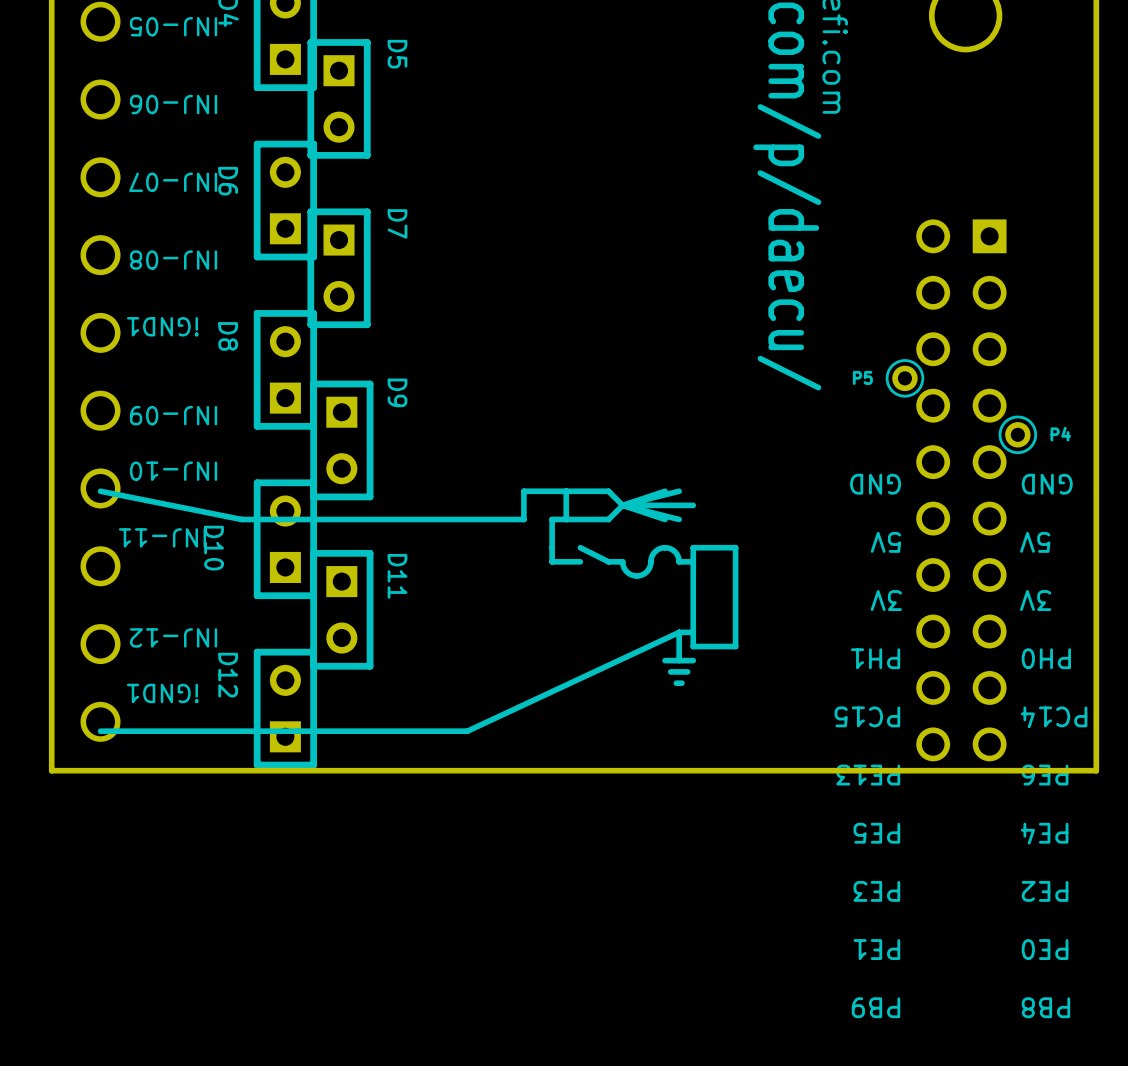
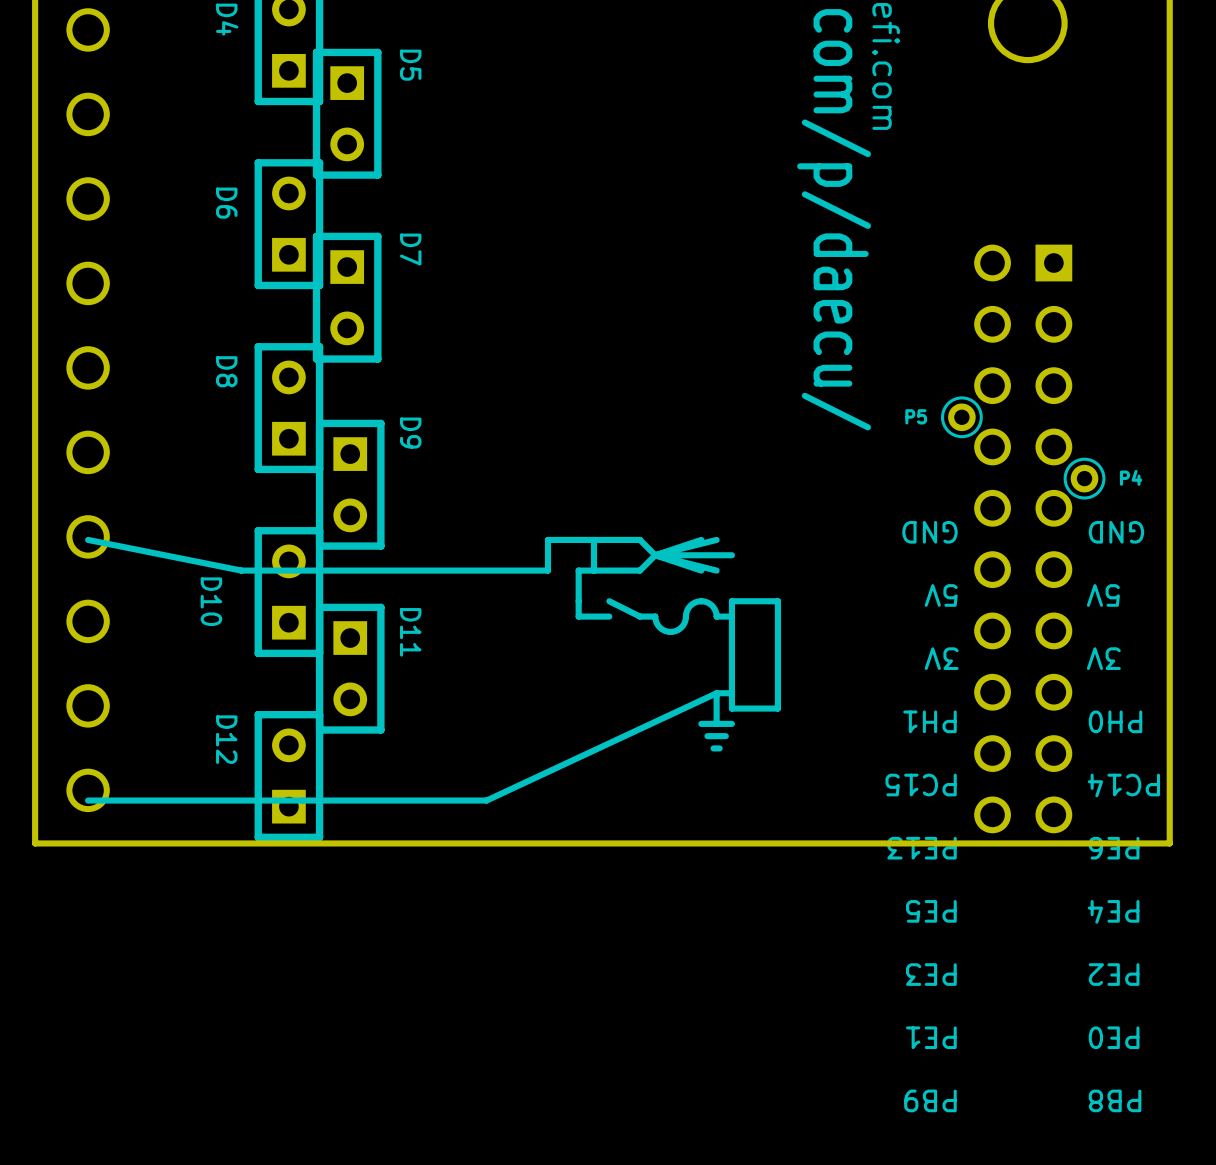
text: INJ-05 (173, 26) -> none
text: INJ-06 (173, 104) -> none
text: INJ-07 (173, 182) -> none
text: INJ-08 (173, 260) -> none
text: iGND1 (162, 326) -> none
text: INJ-09 (173, 415) -> none
text: INJ-10 (173, 471) -> none
text: INJ-11 (162, 537) -> none
text: INJ-12 (173, 637) -> none
text: iGND1 (162, 693) -> none

